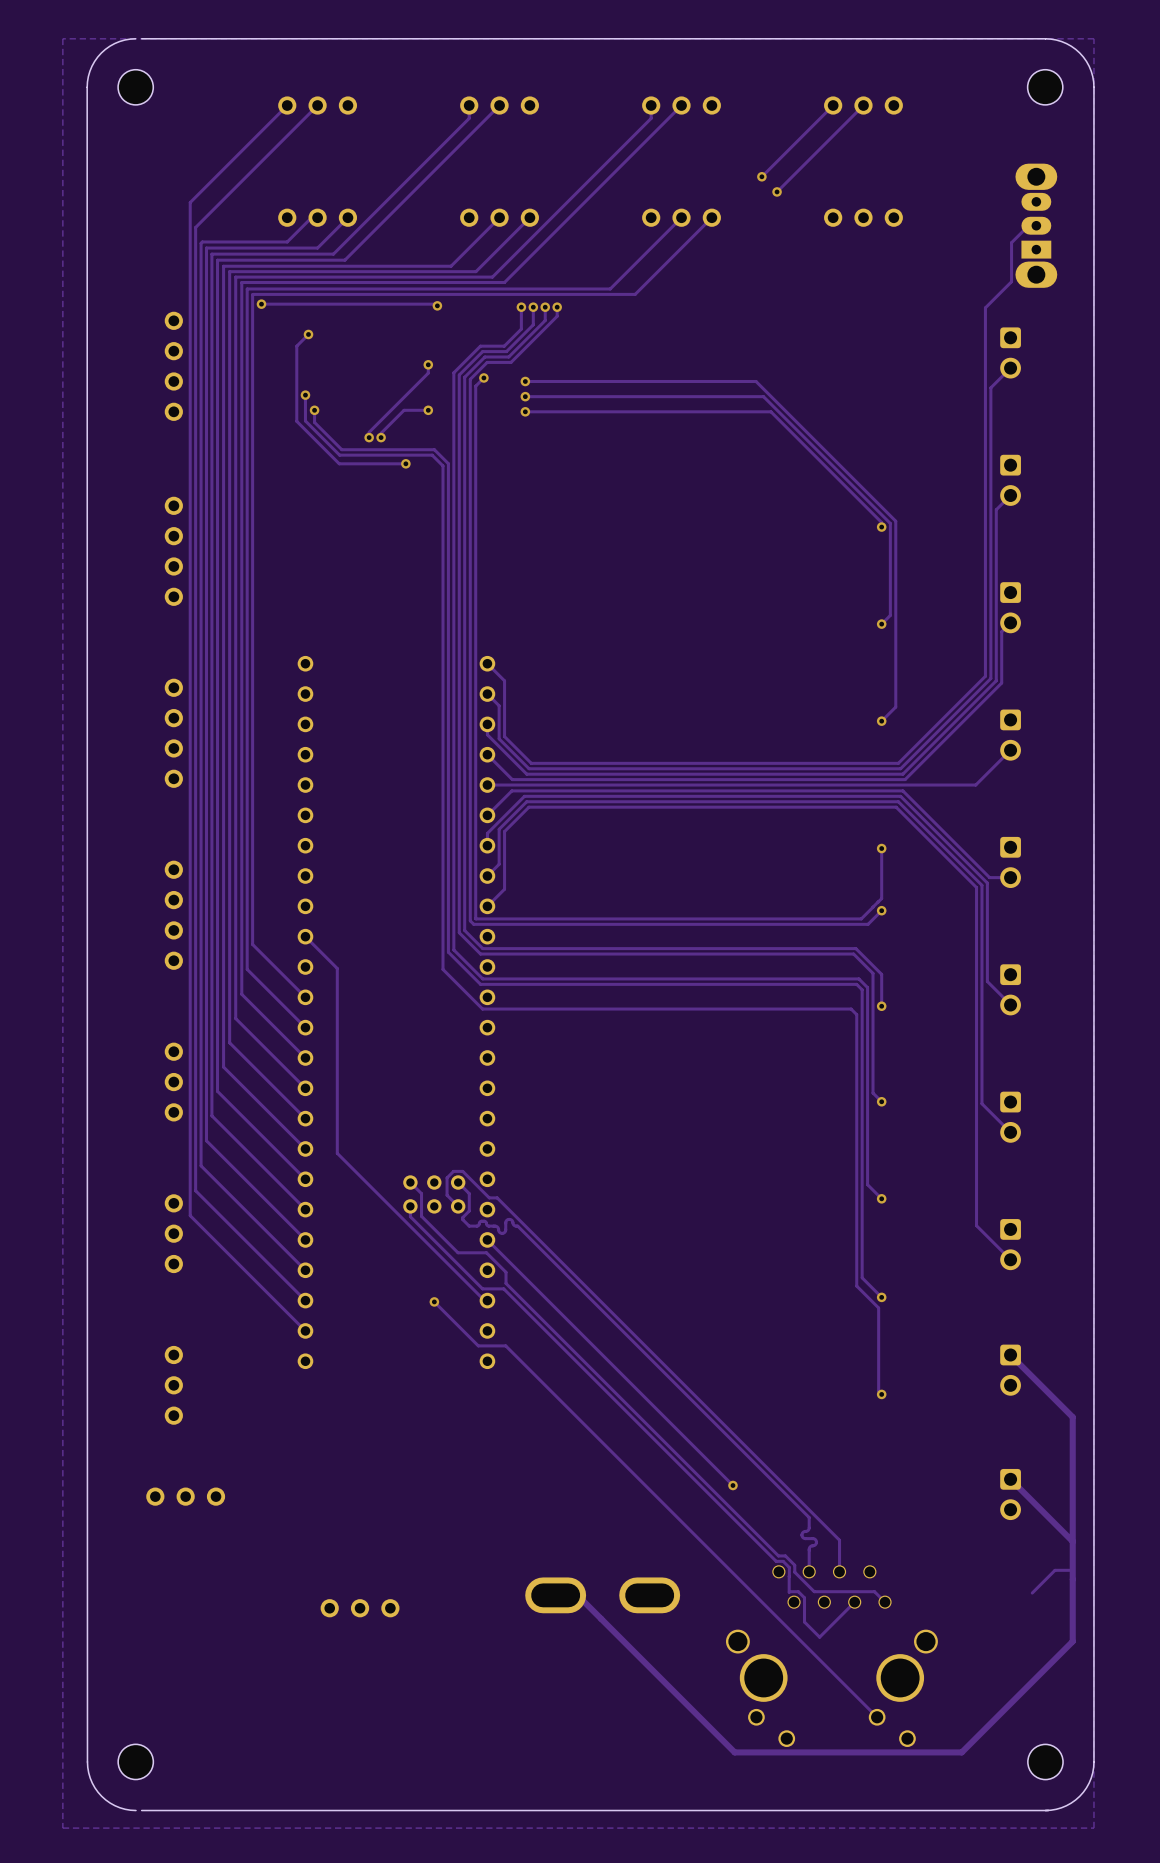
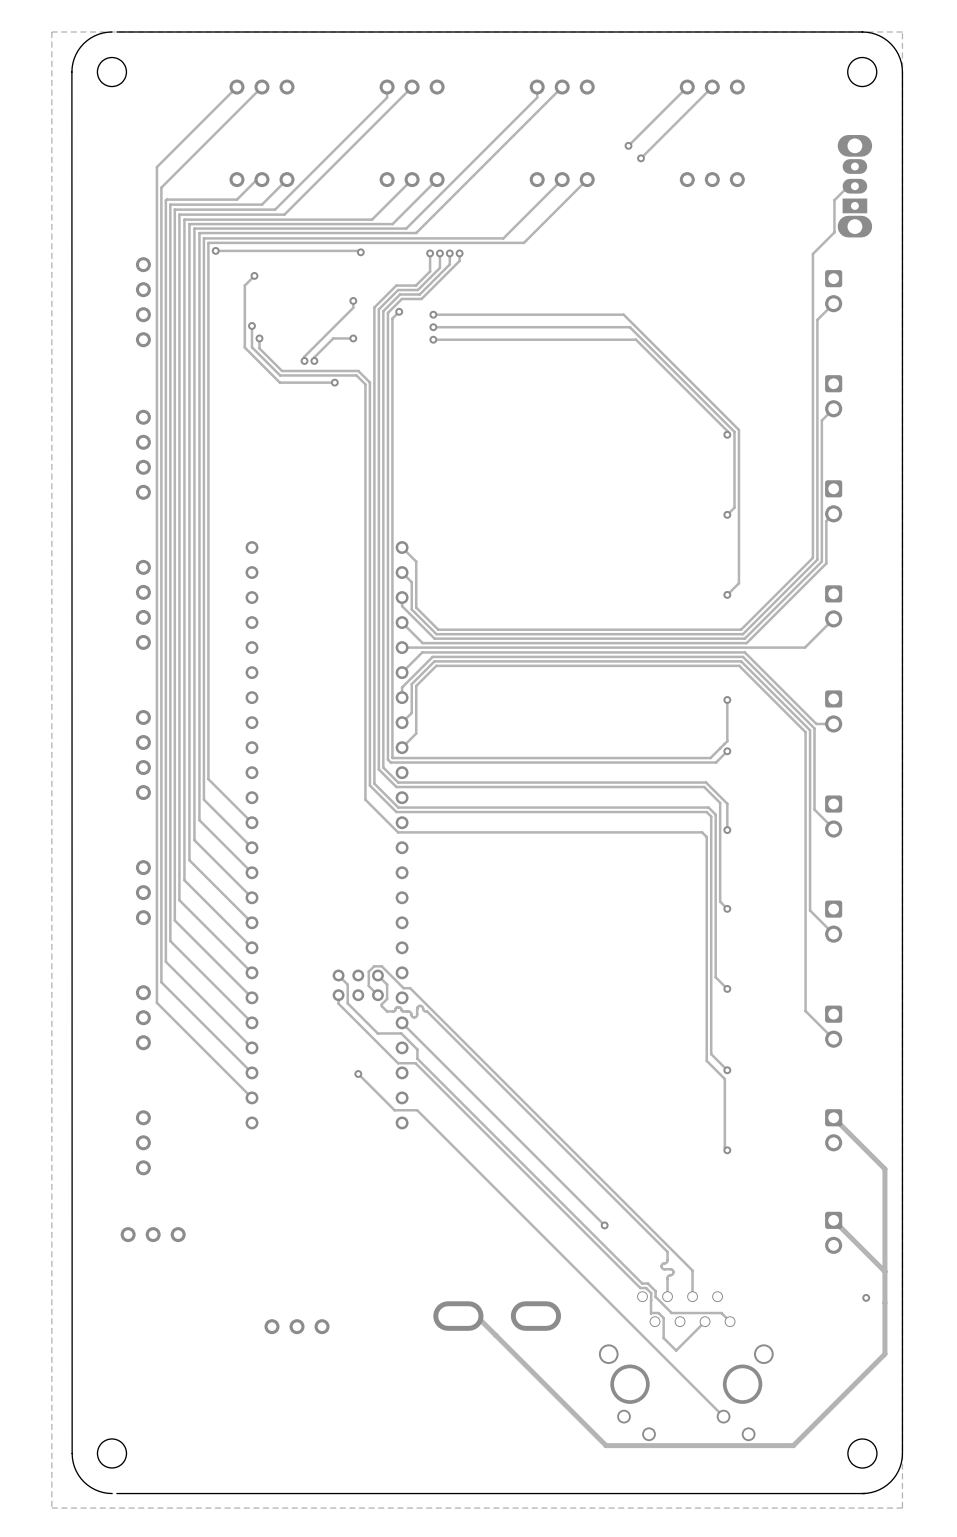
track: (305, 936) (337, 968) (337, 1153) (484, 1300) -> none
track: (1072, 1570) (1055, 1570) (1032, 1593) -> none
via: none -> (866, 1297)

